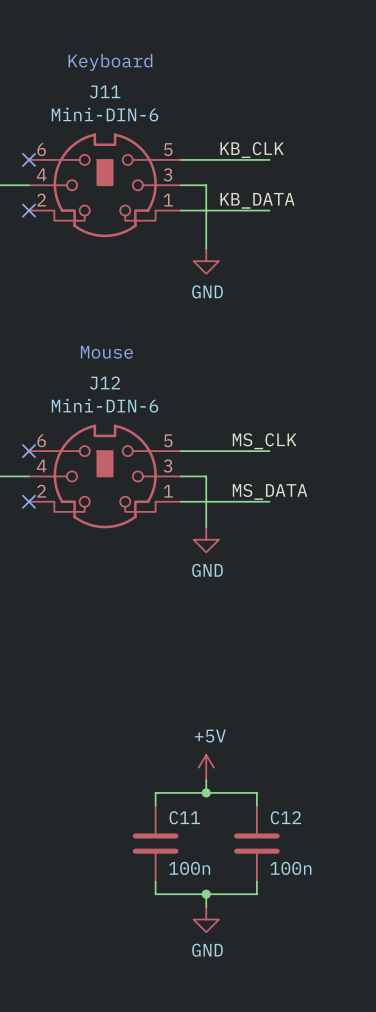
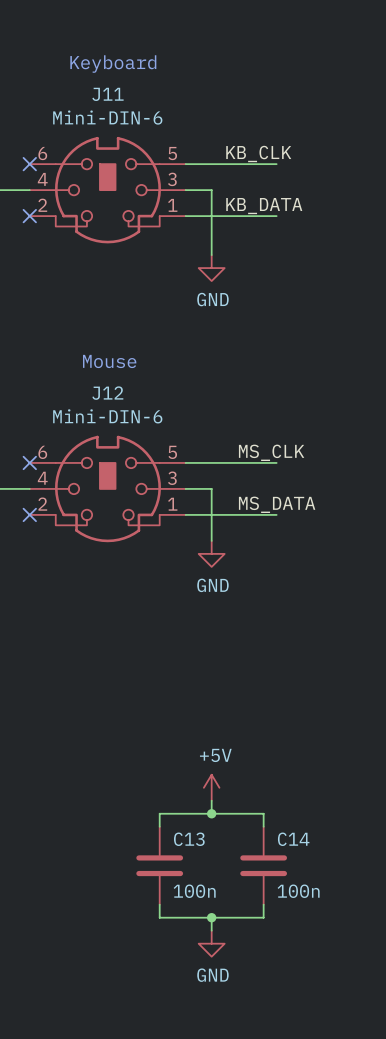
C11 name: C11 (184, 817) -> C13 (189, 839)
C12 name: C12 (285, 817) -> C14 (293, 839)

